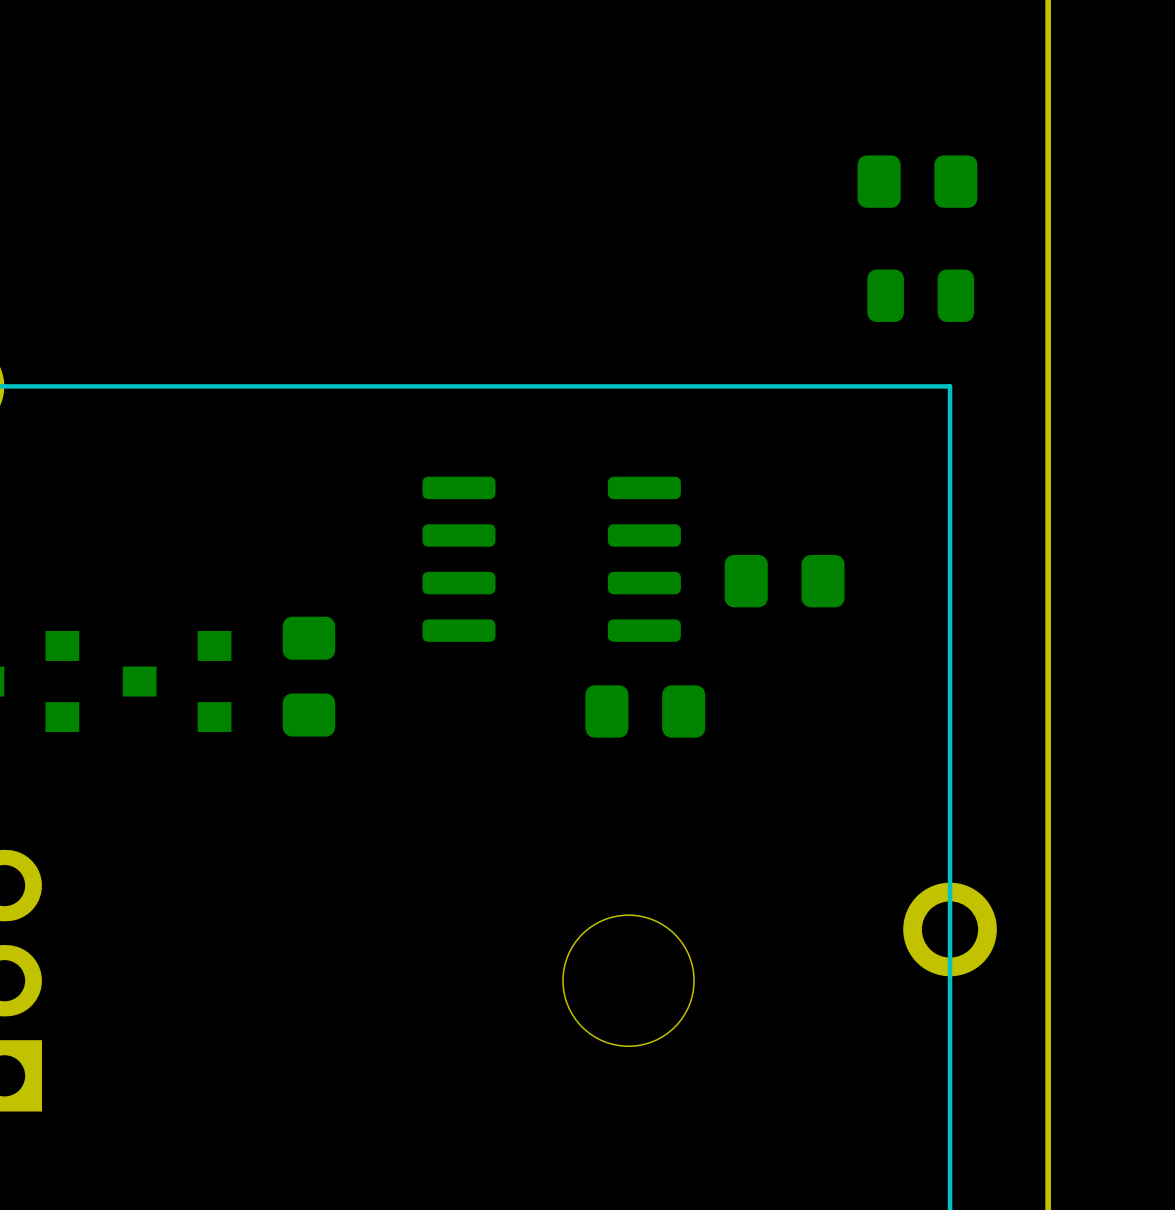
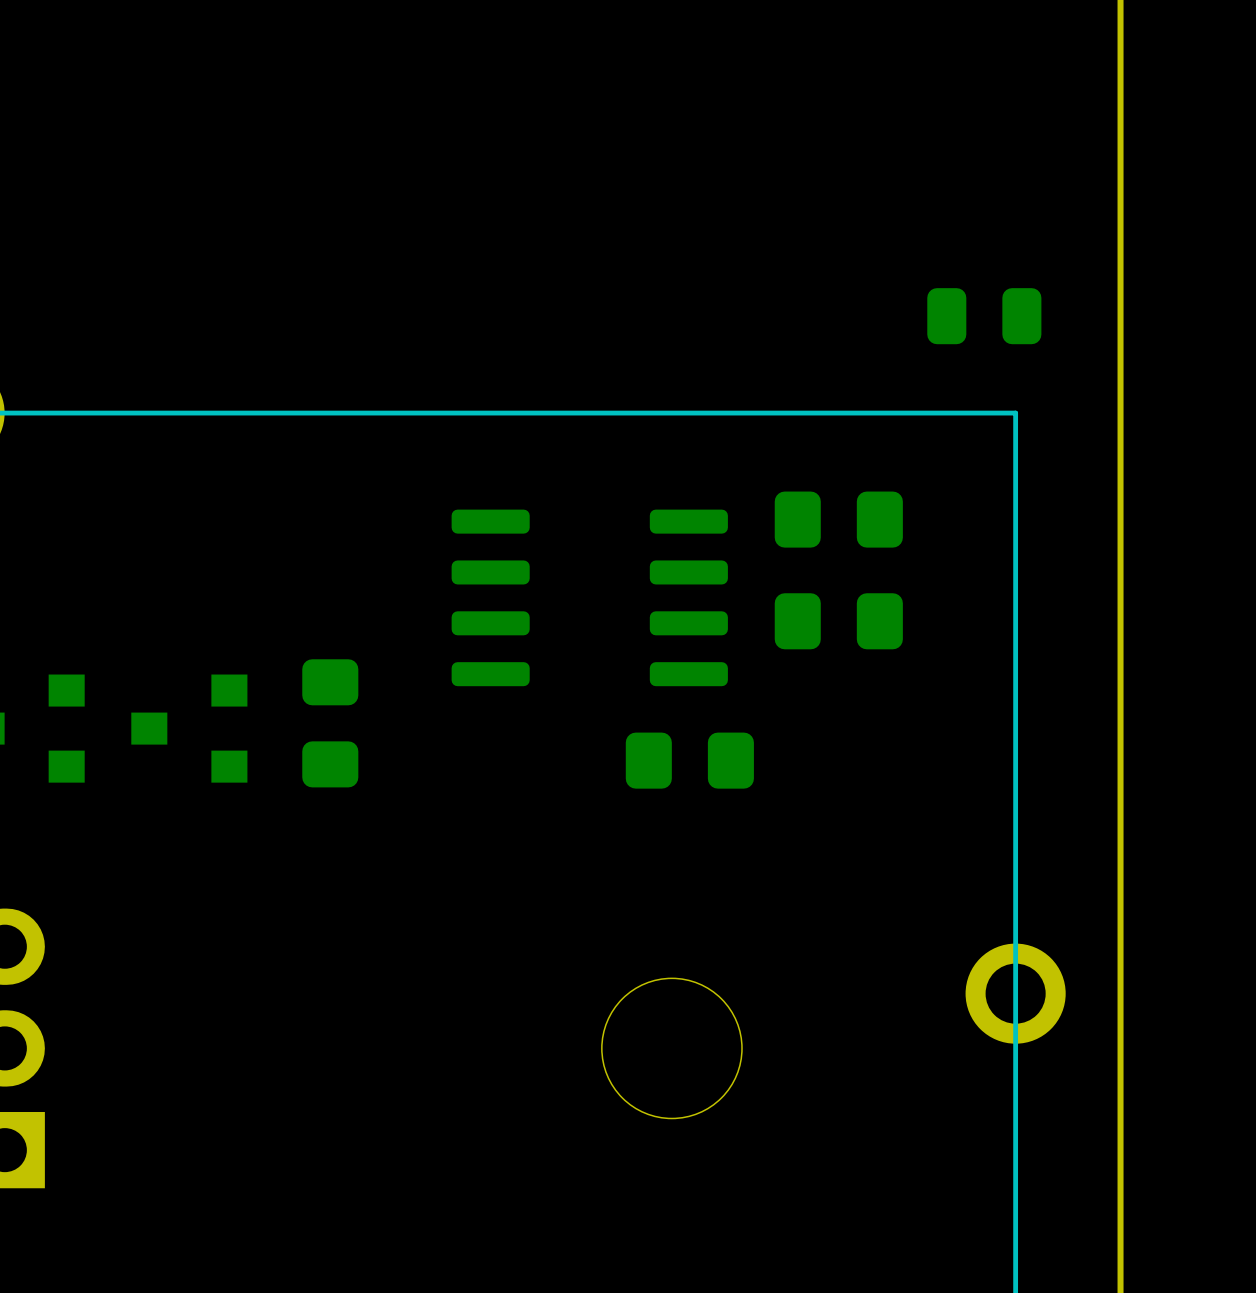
part position: (917, 181) -> (838, 519)

